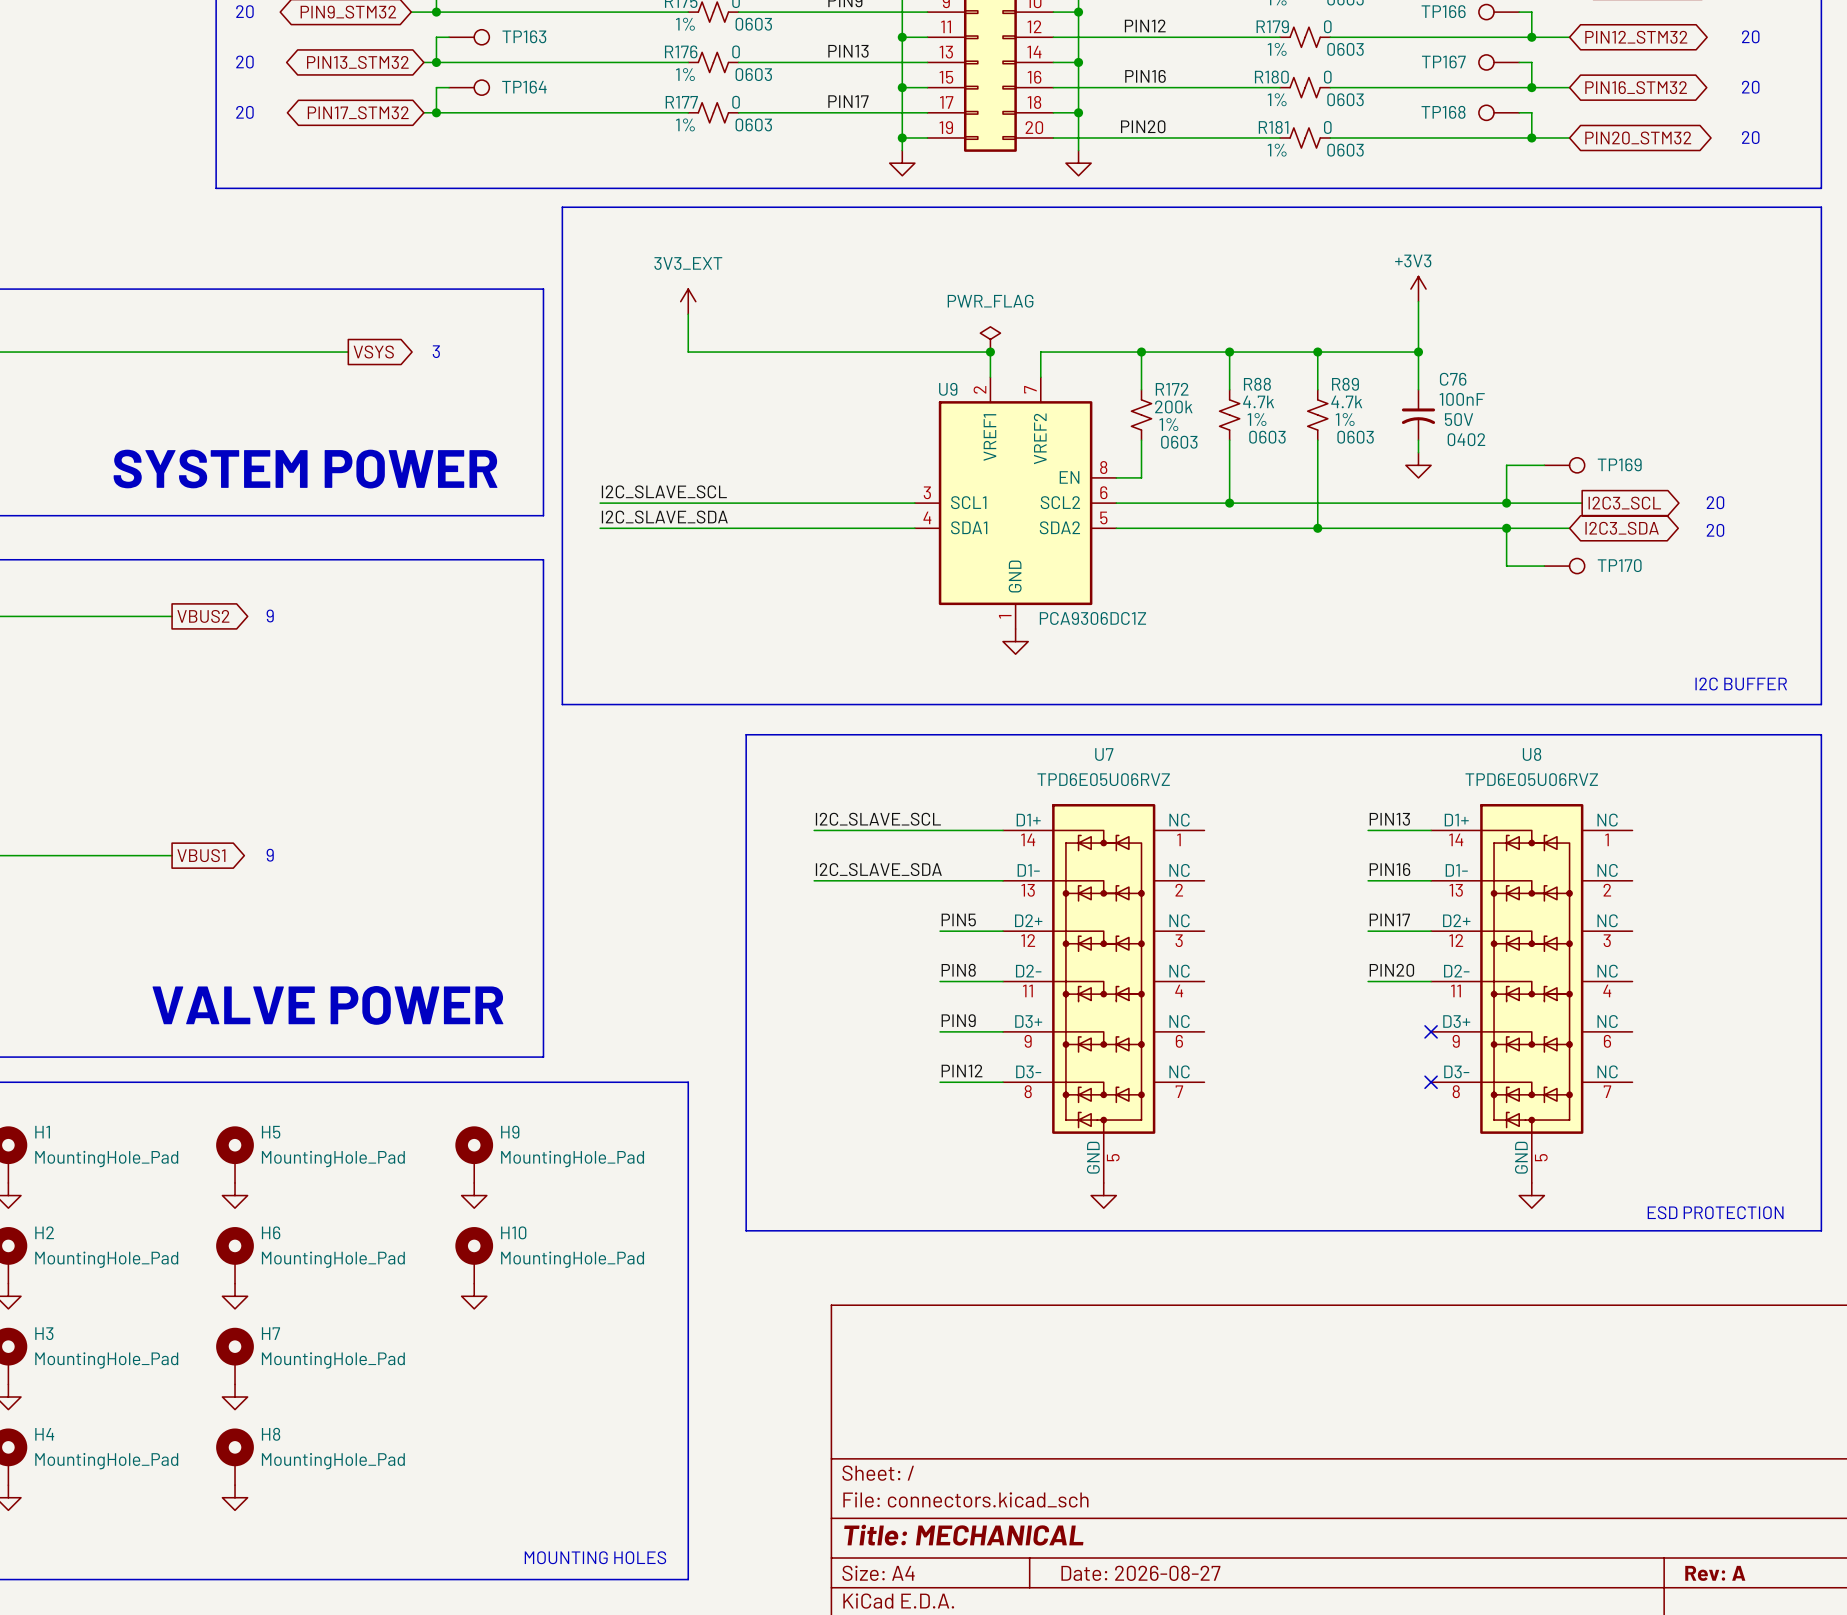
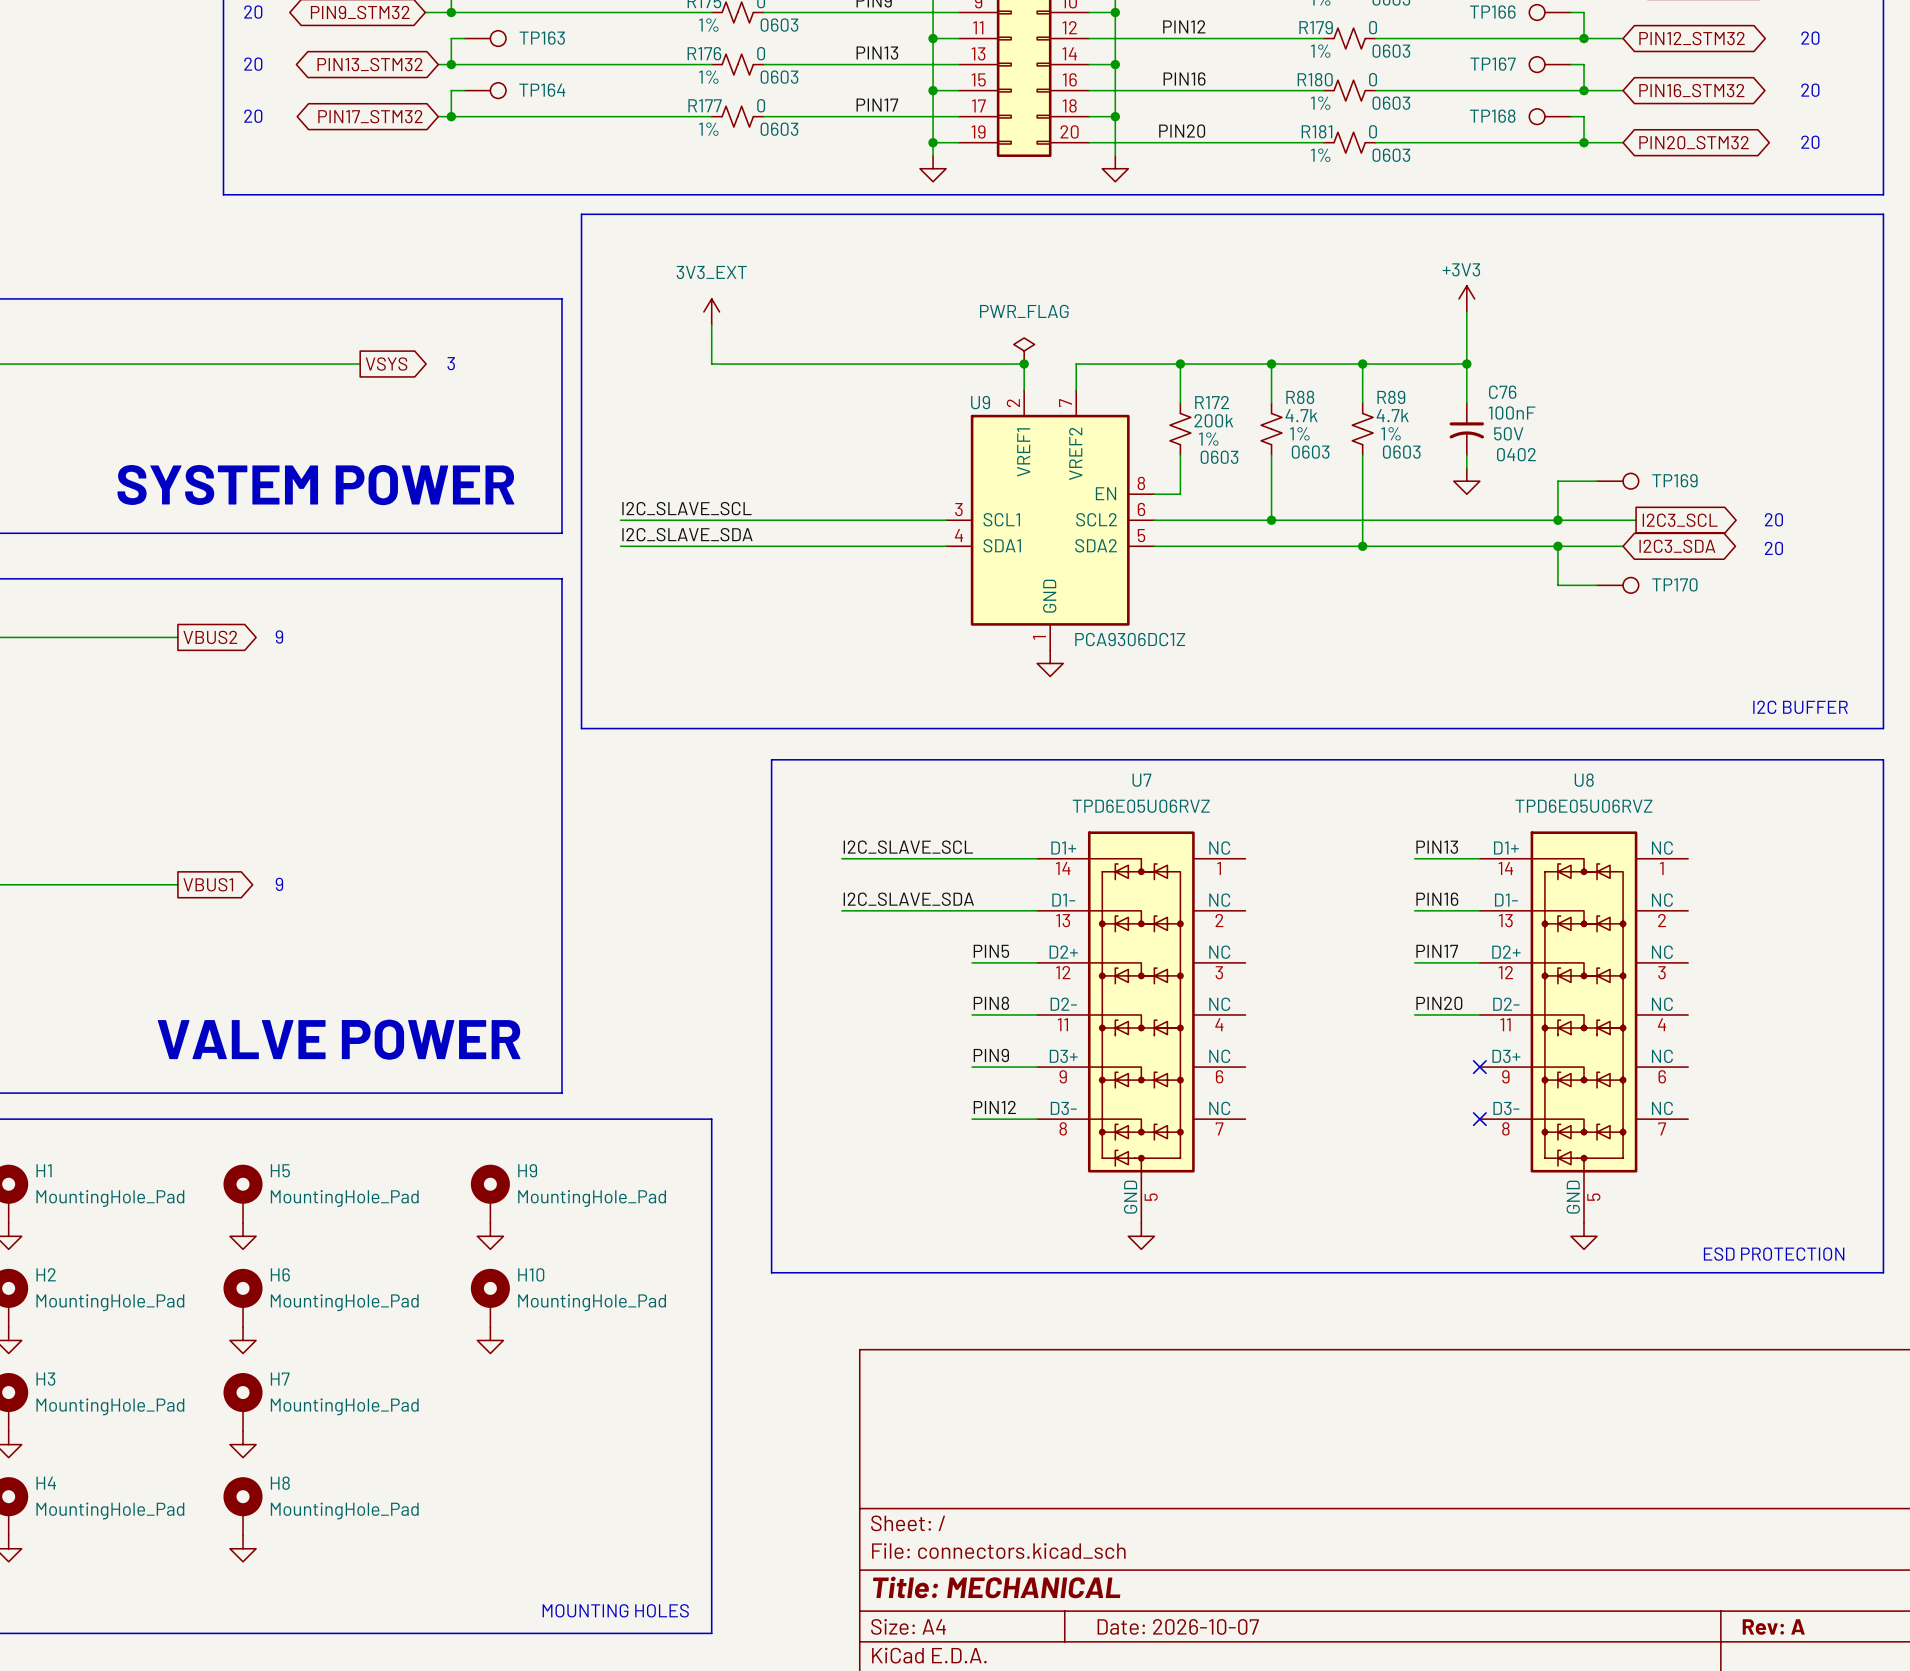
title block: Date: 2026-08-27 (1140, 1573) -> Date: 2026-10-07 (1178, 1626)

